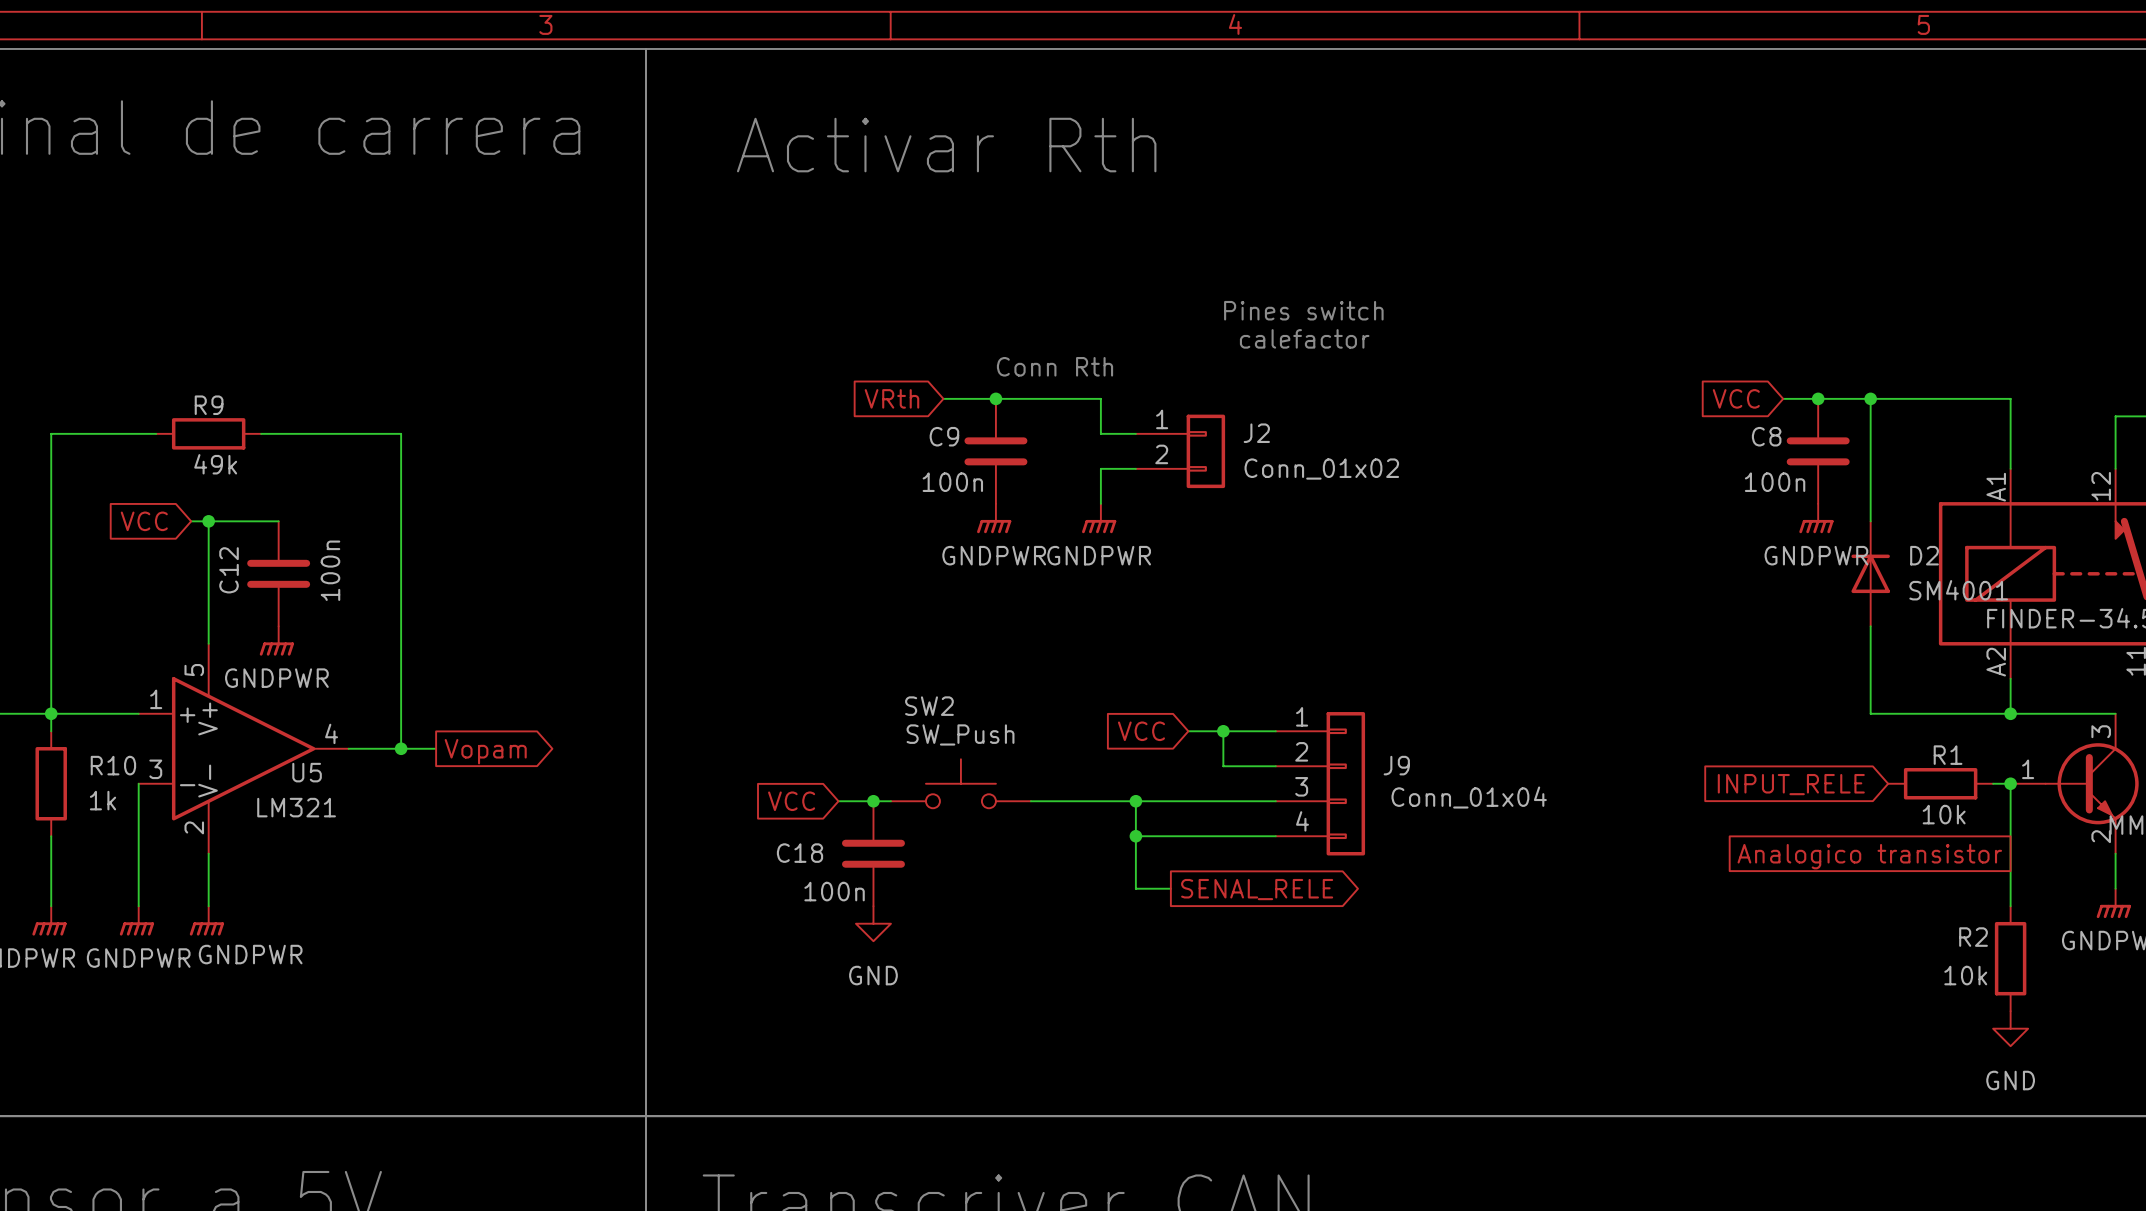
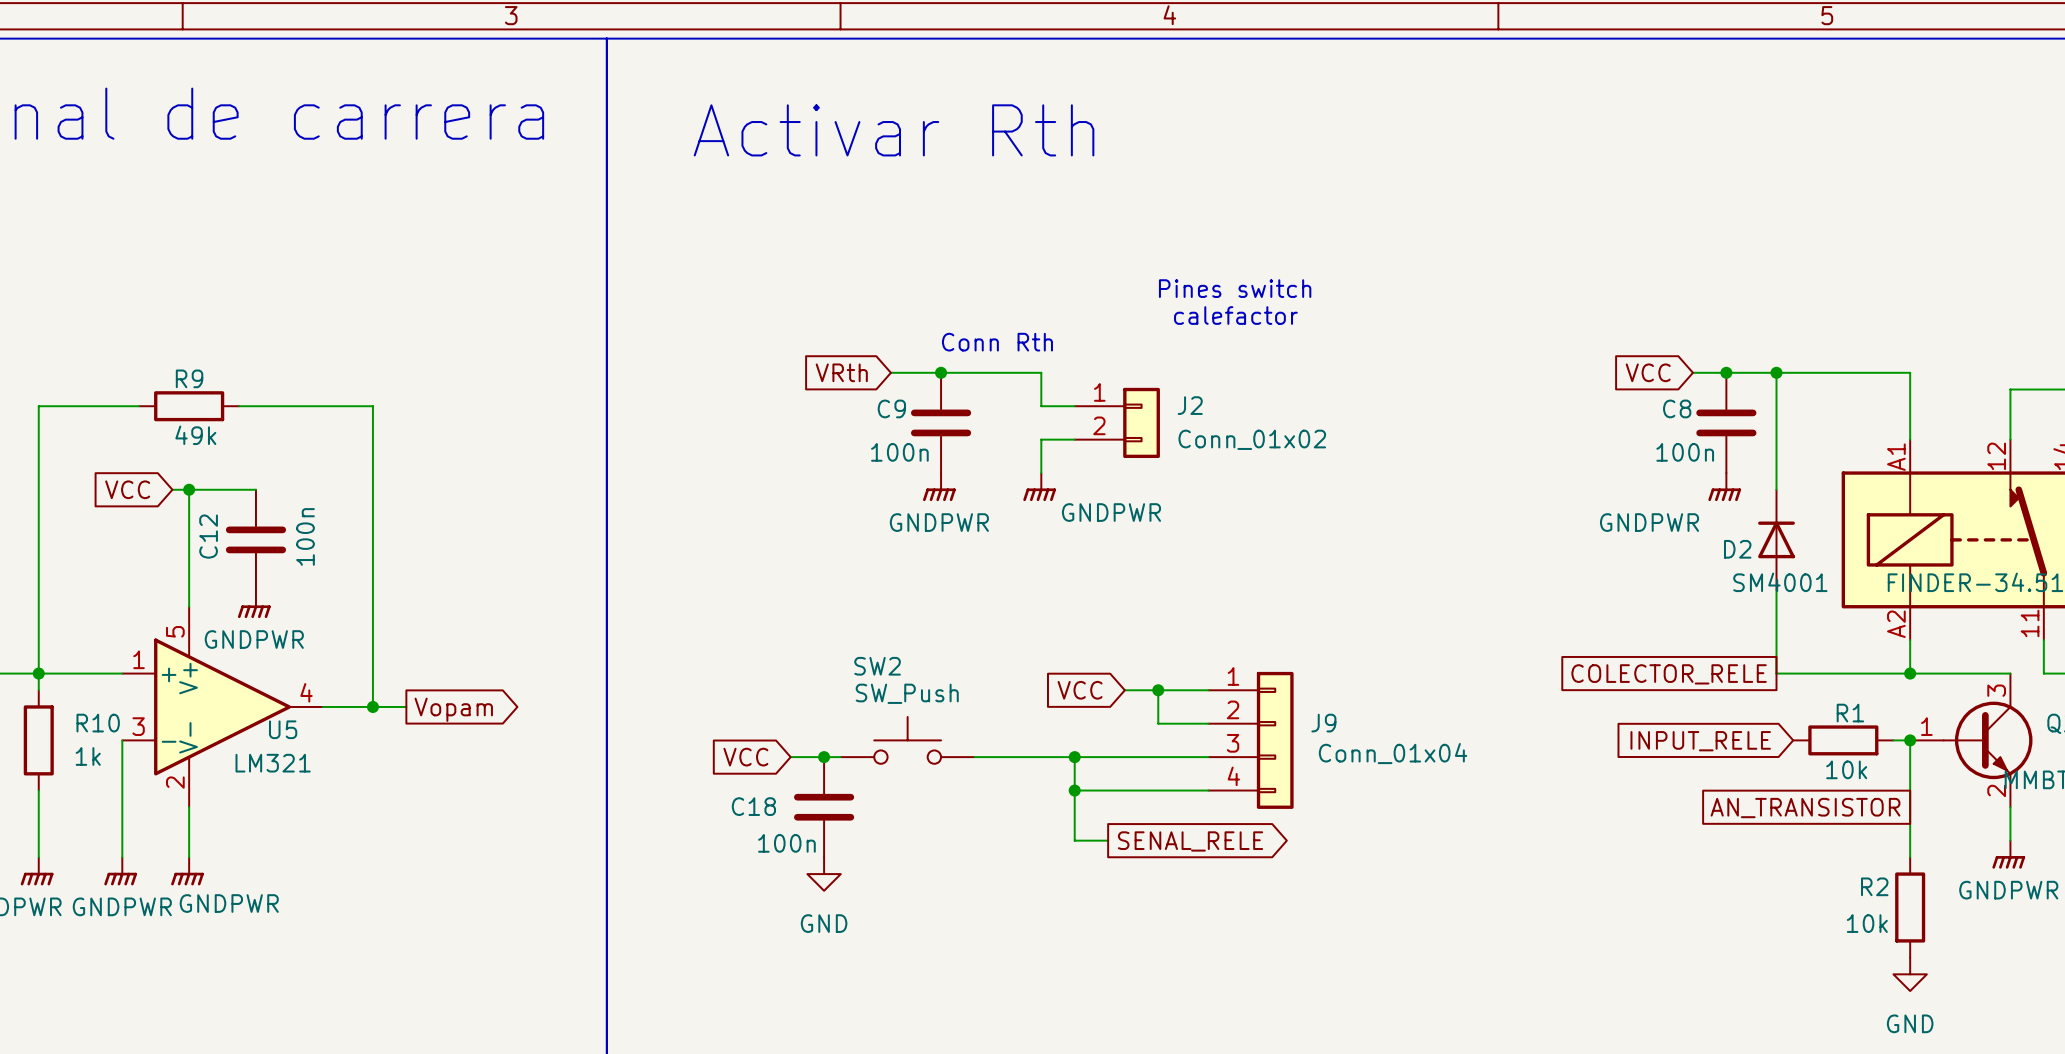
power symbol text position: GNDPWR (1099, 555) -> GNDPWR (1111, 512)
power symbol text position: GNDPWR (1816, 555) -> GNDPWR (1649, 522)
D2 name position: D2 (1924, 555) -> D2 (1737, 549)
D2 value position: SM4001 (1958, 590) -> SM4001 (1780, 582)
global label: none -> COLECTOR_RELE (1669, 674)
global label: Analogico transistor (1869, 856) -> AN_TRANSISTOR (1805, 808)

